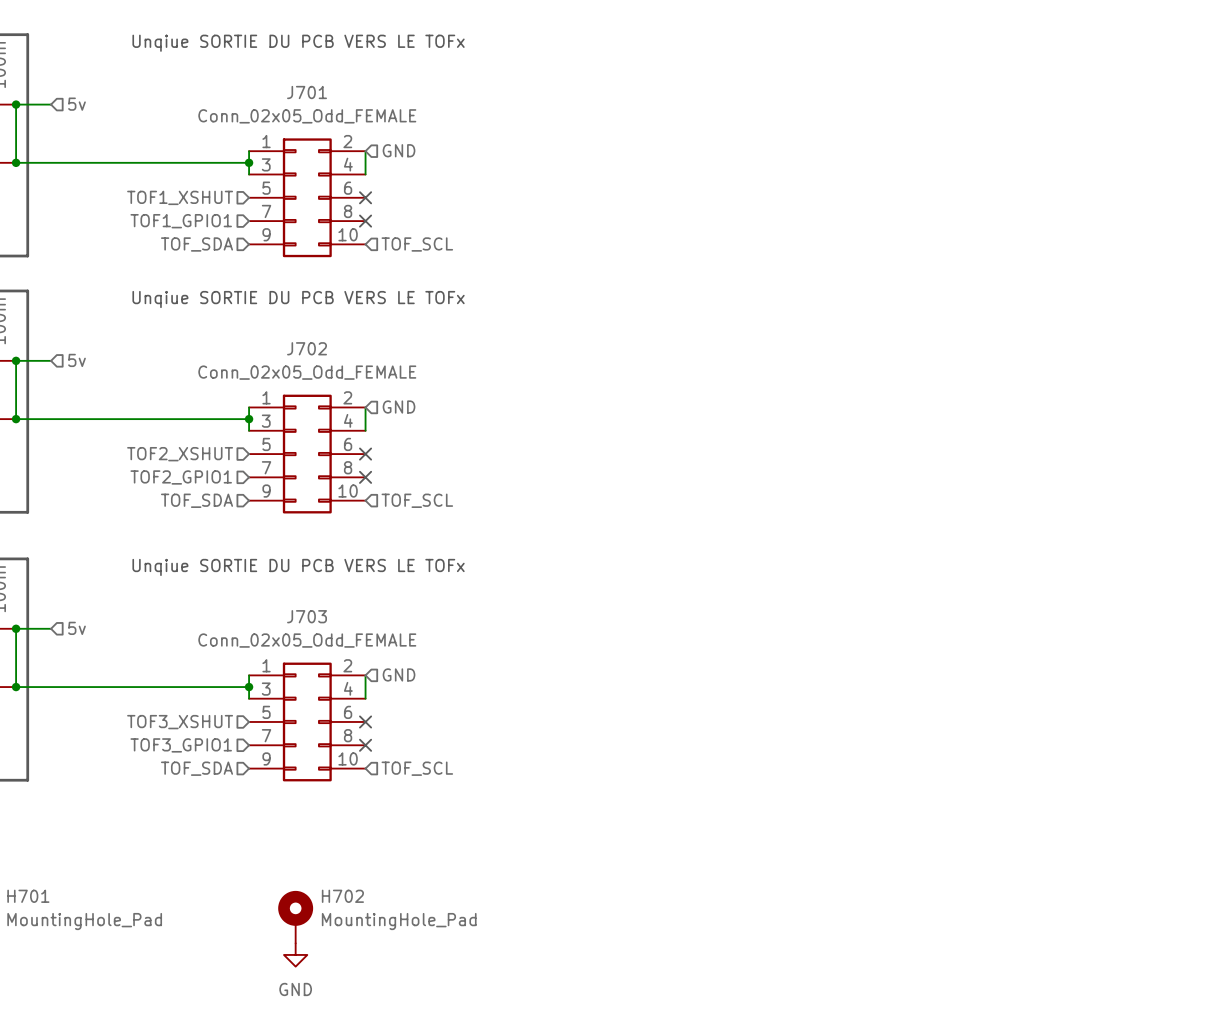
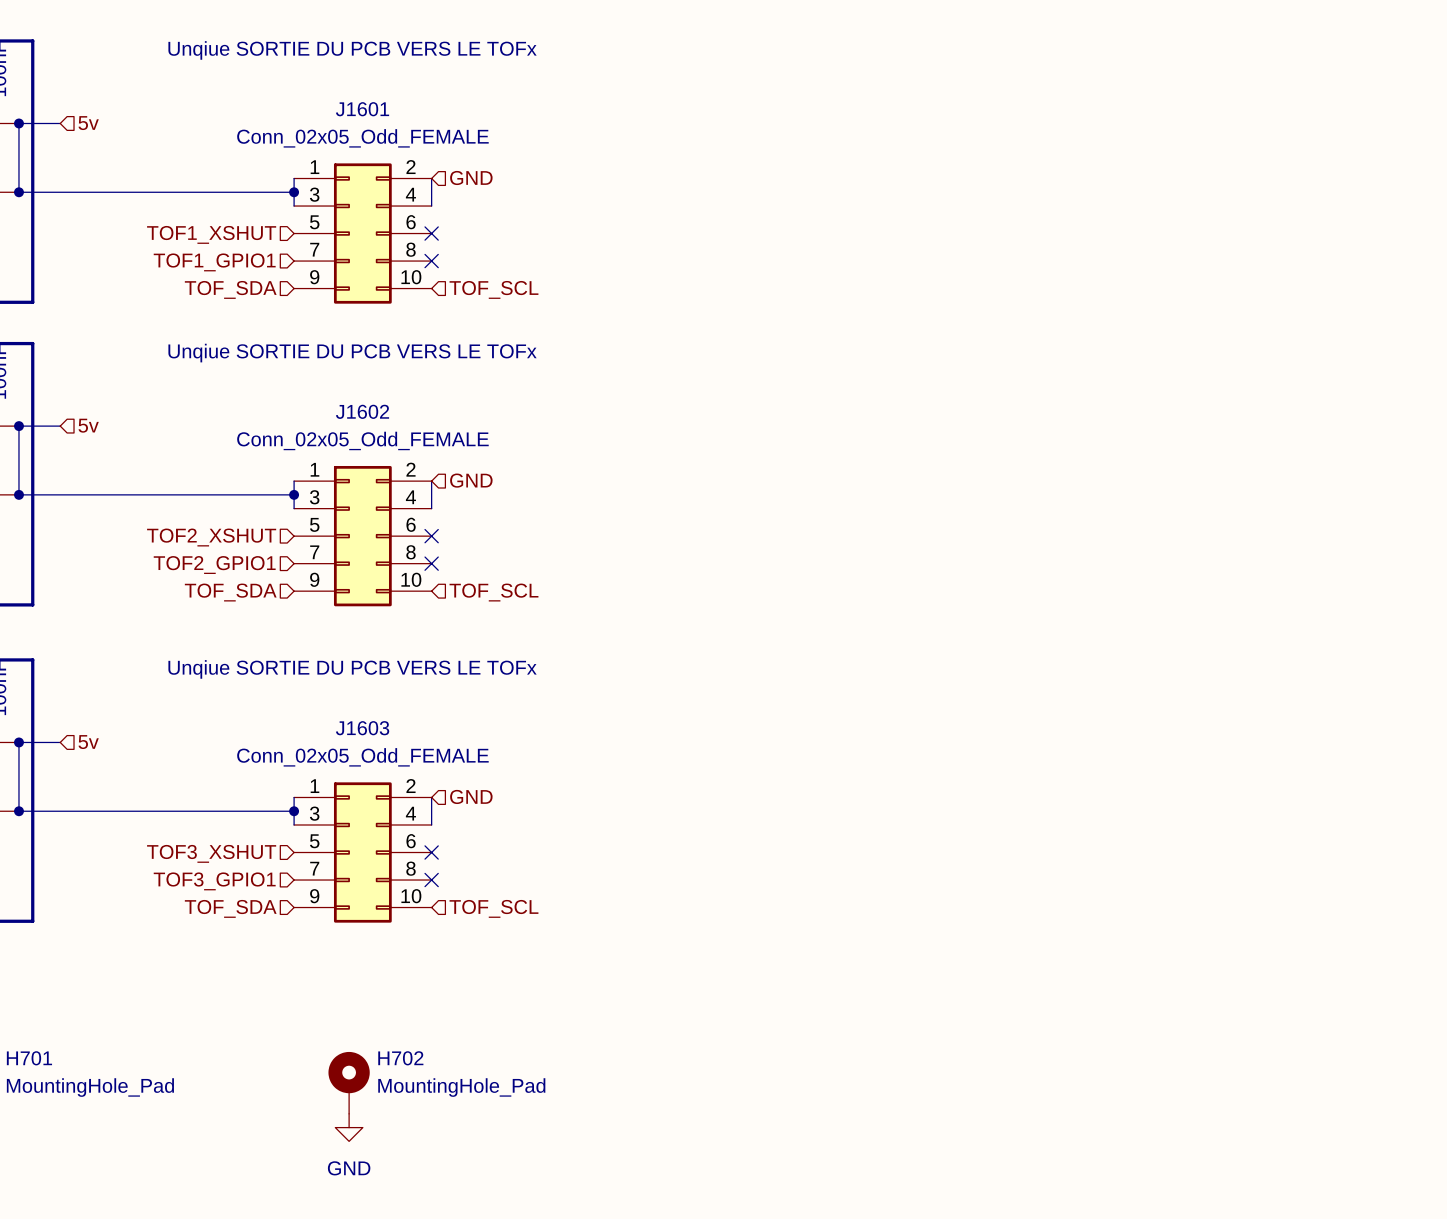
J701 name: J701 (307, 92) -> J1601 (362, 109)
J702 name: J702 (307, 348) -> J1602 (362, 411)
J703 name: J703 (307, 616) -> J1603 (362, 728)

